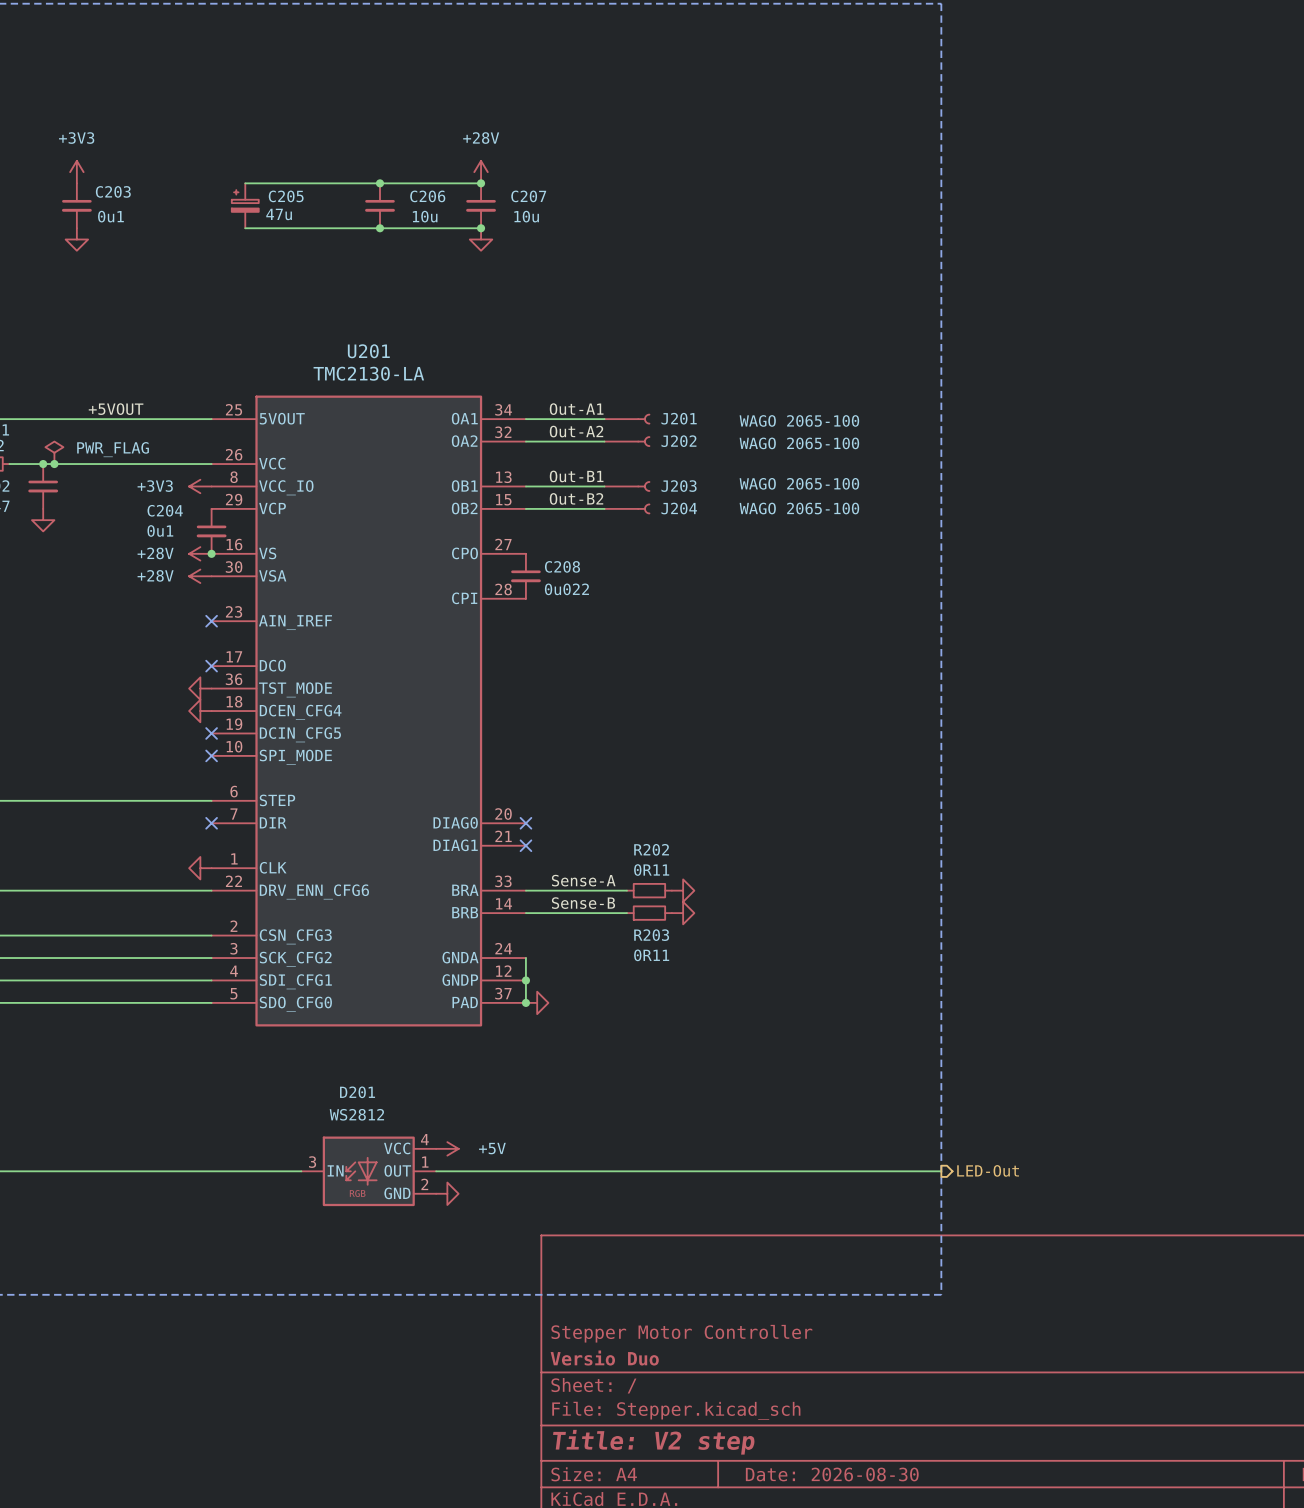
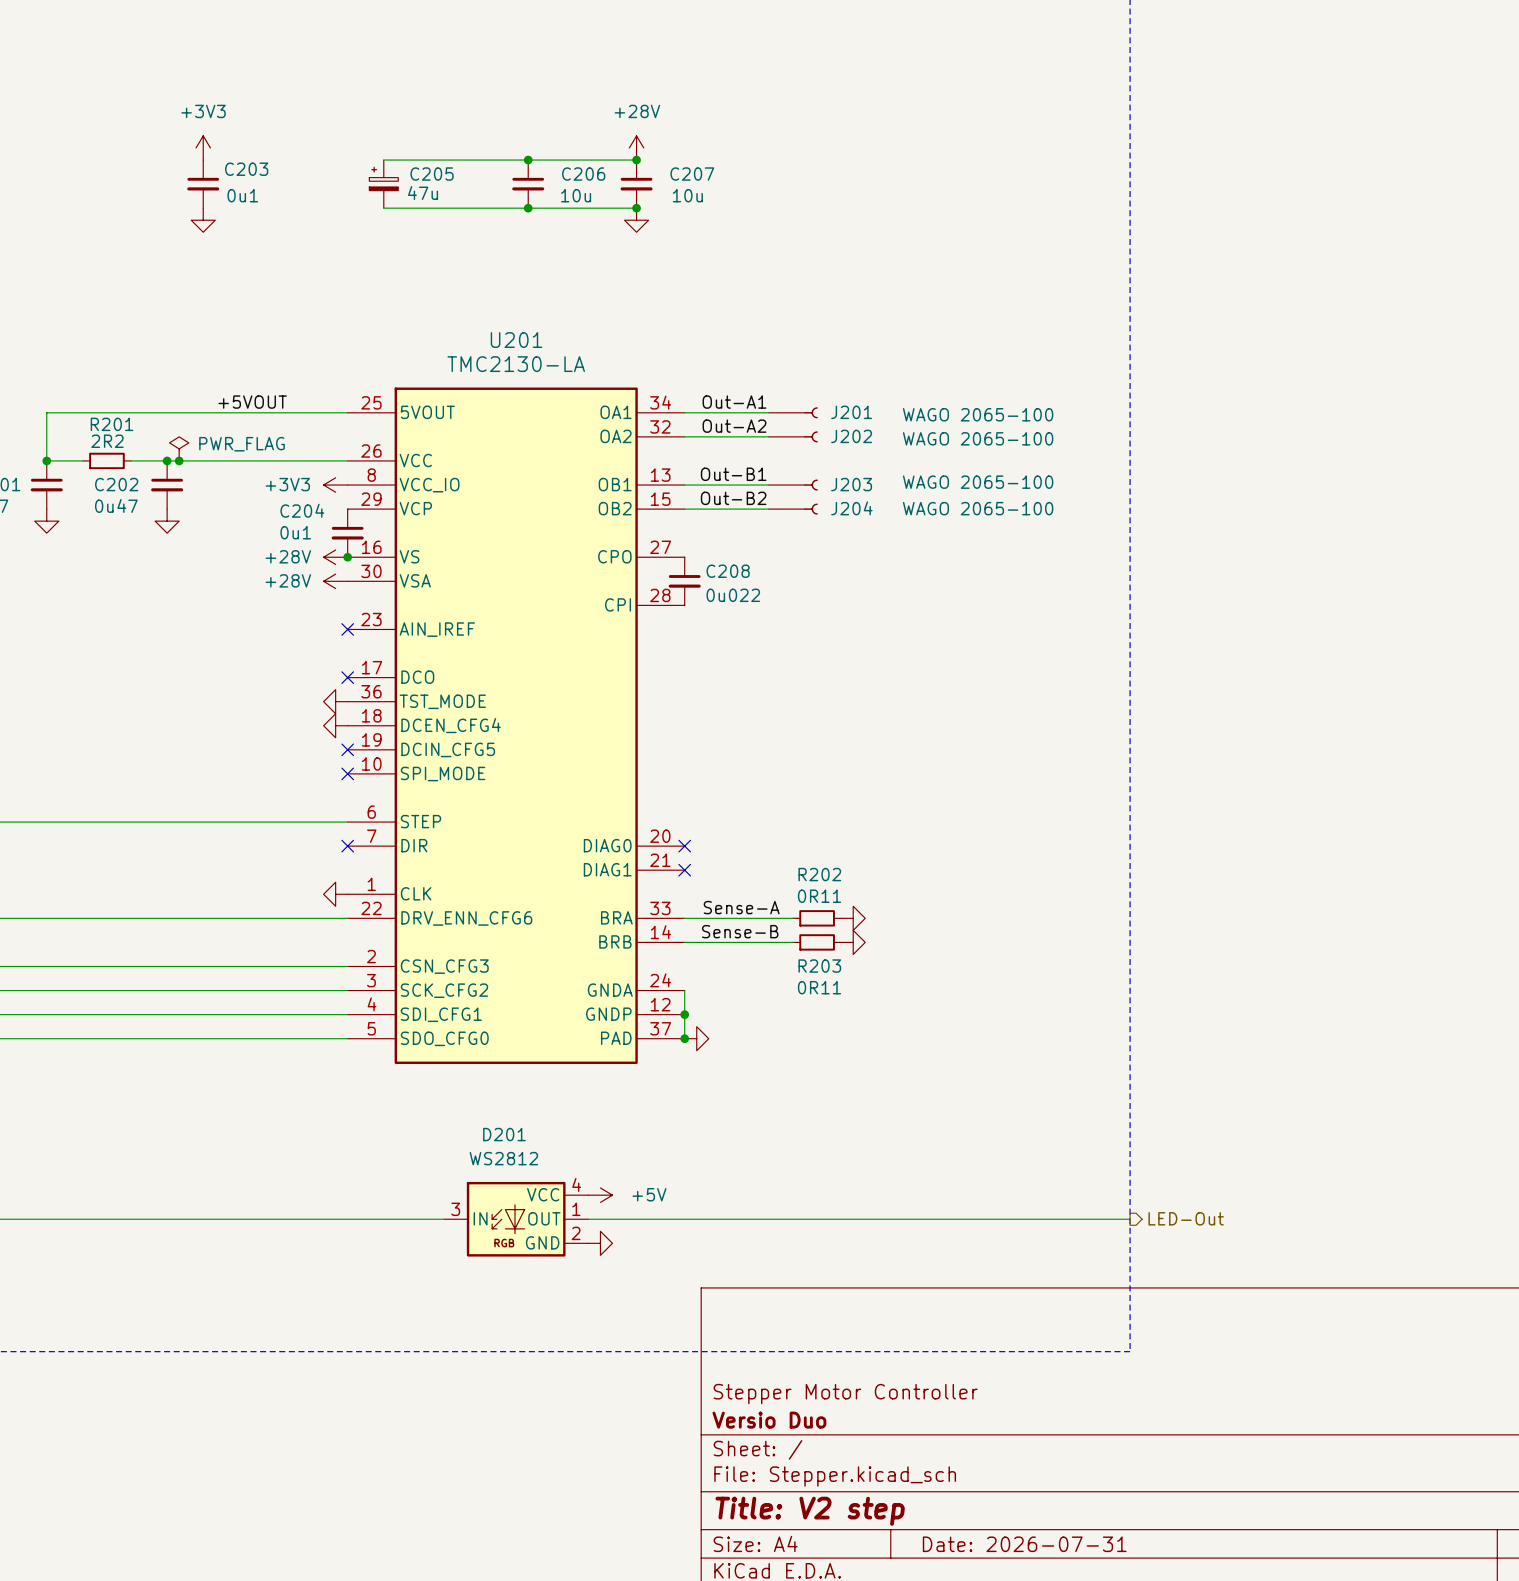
title block: Date: 2026-08-30 (832, 1474) -> Date: 2026-07-31 (1024, 1544)

